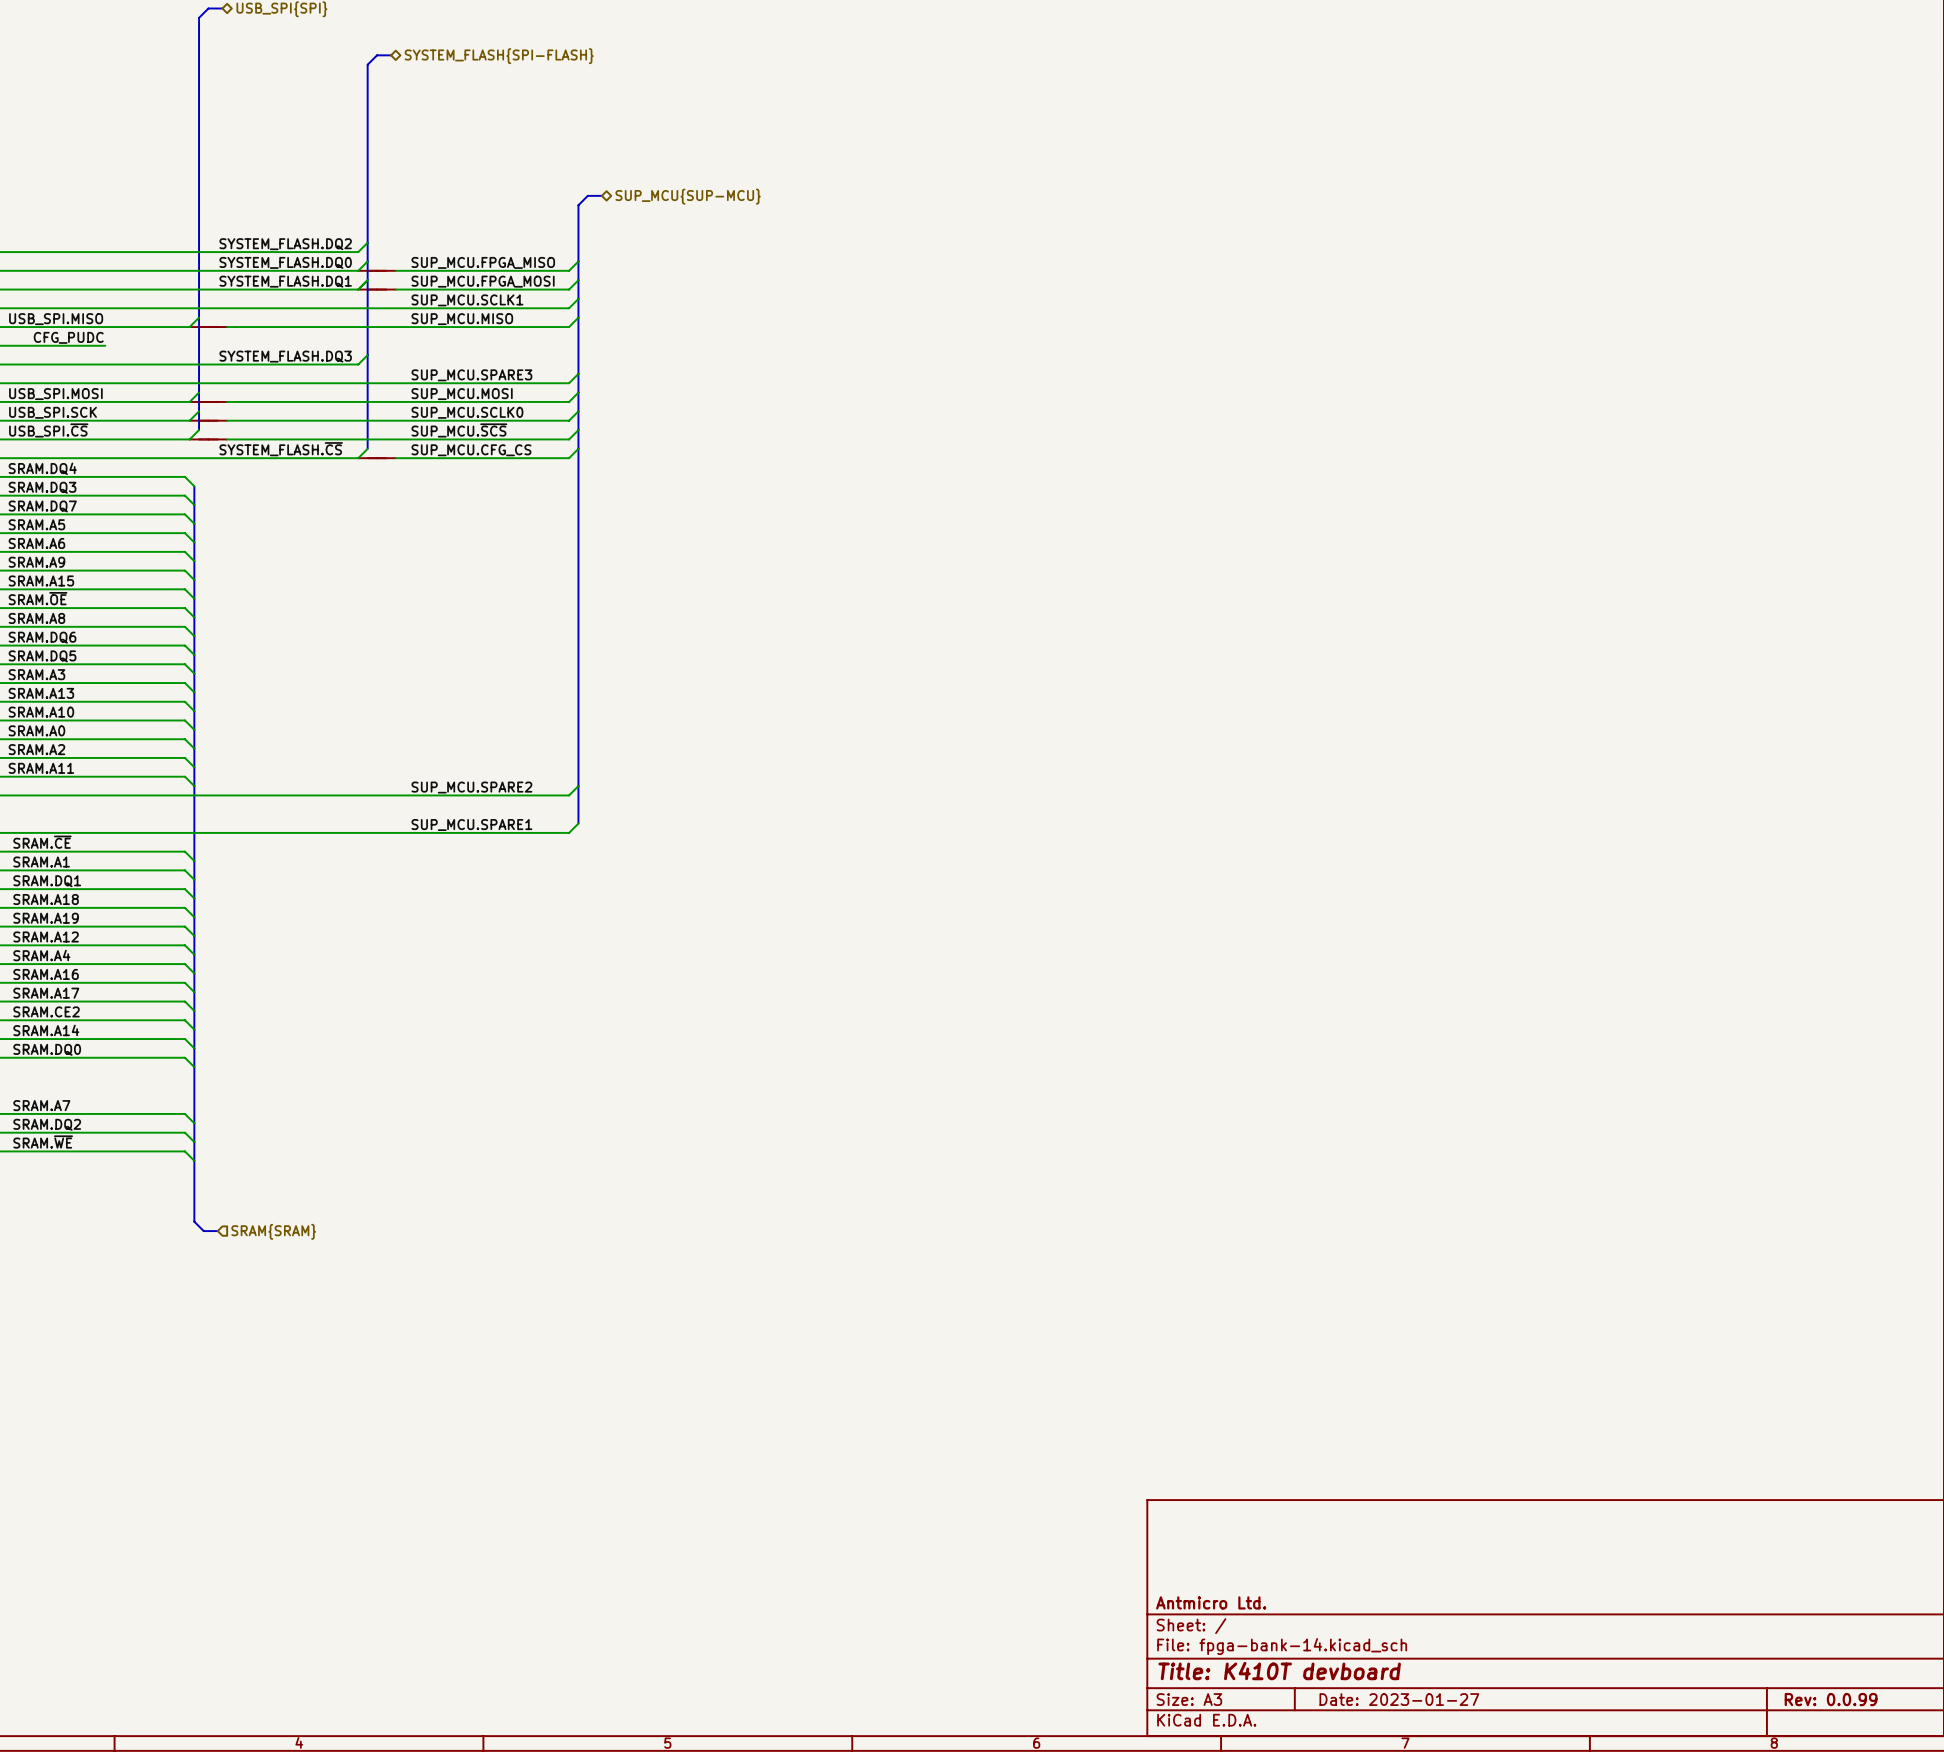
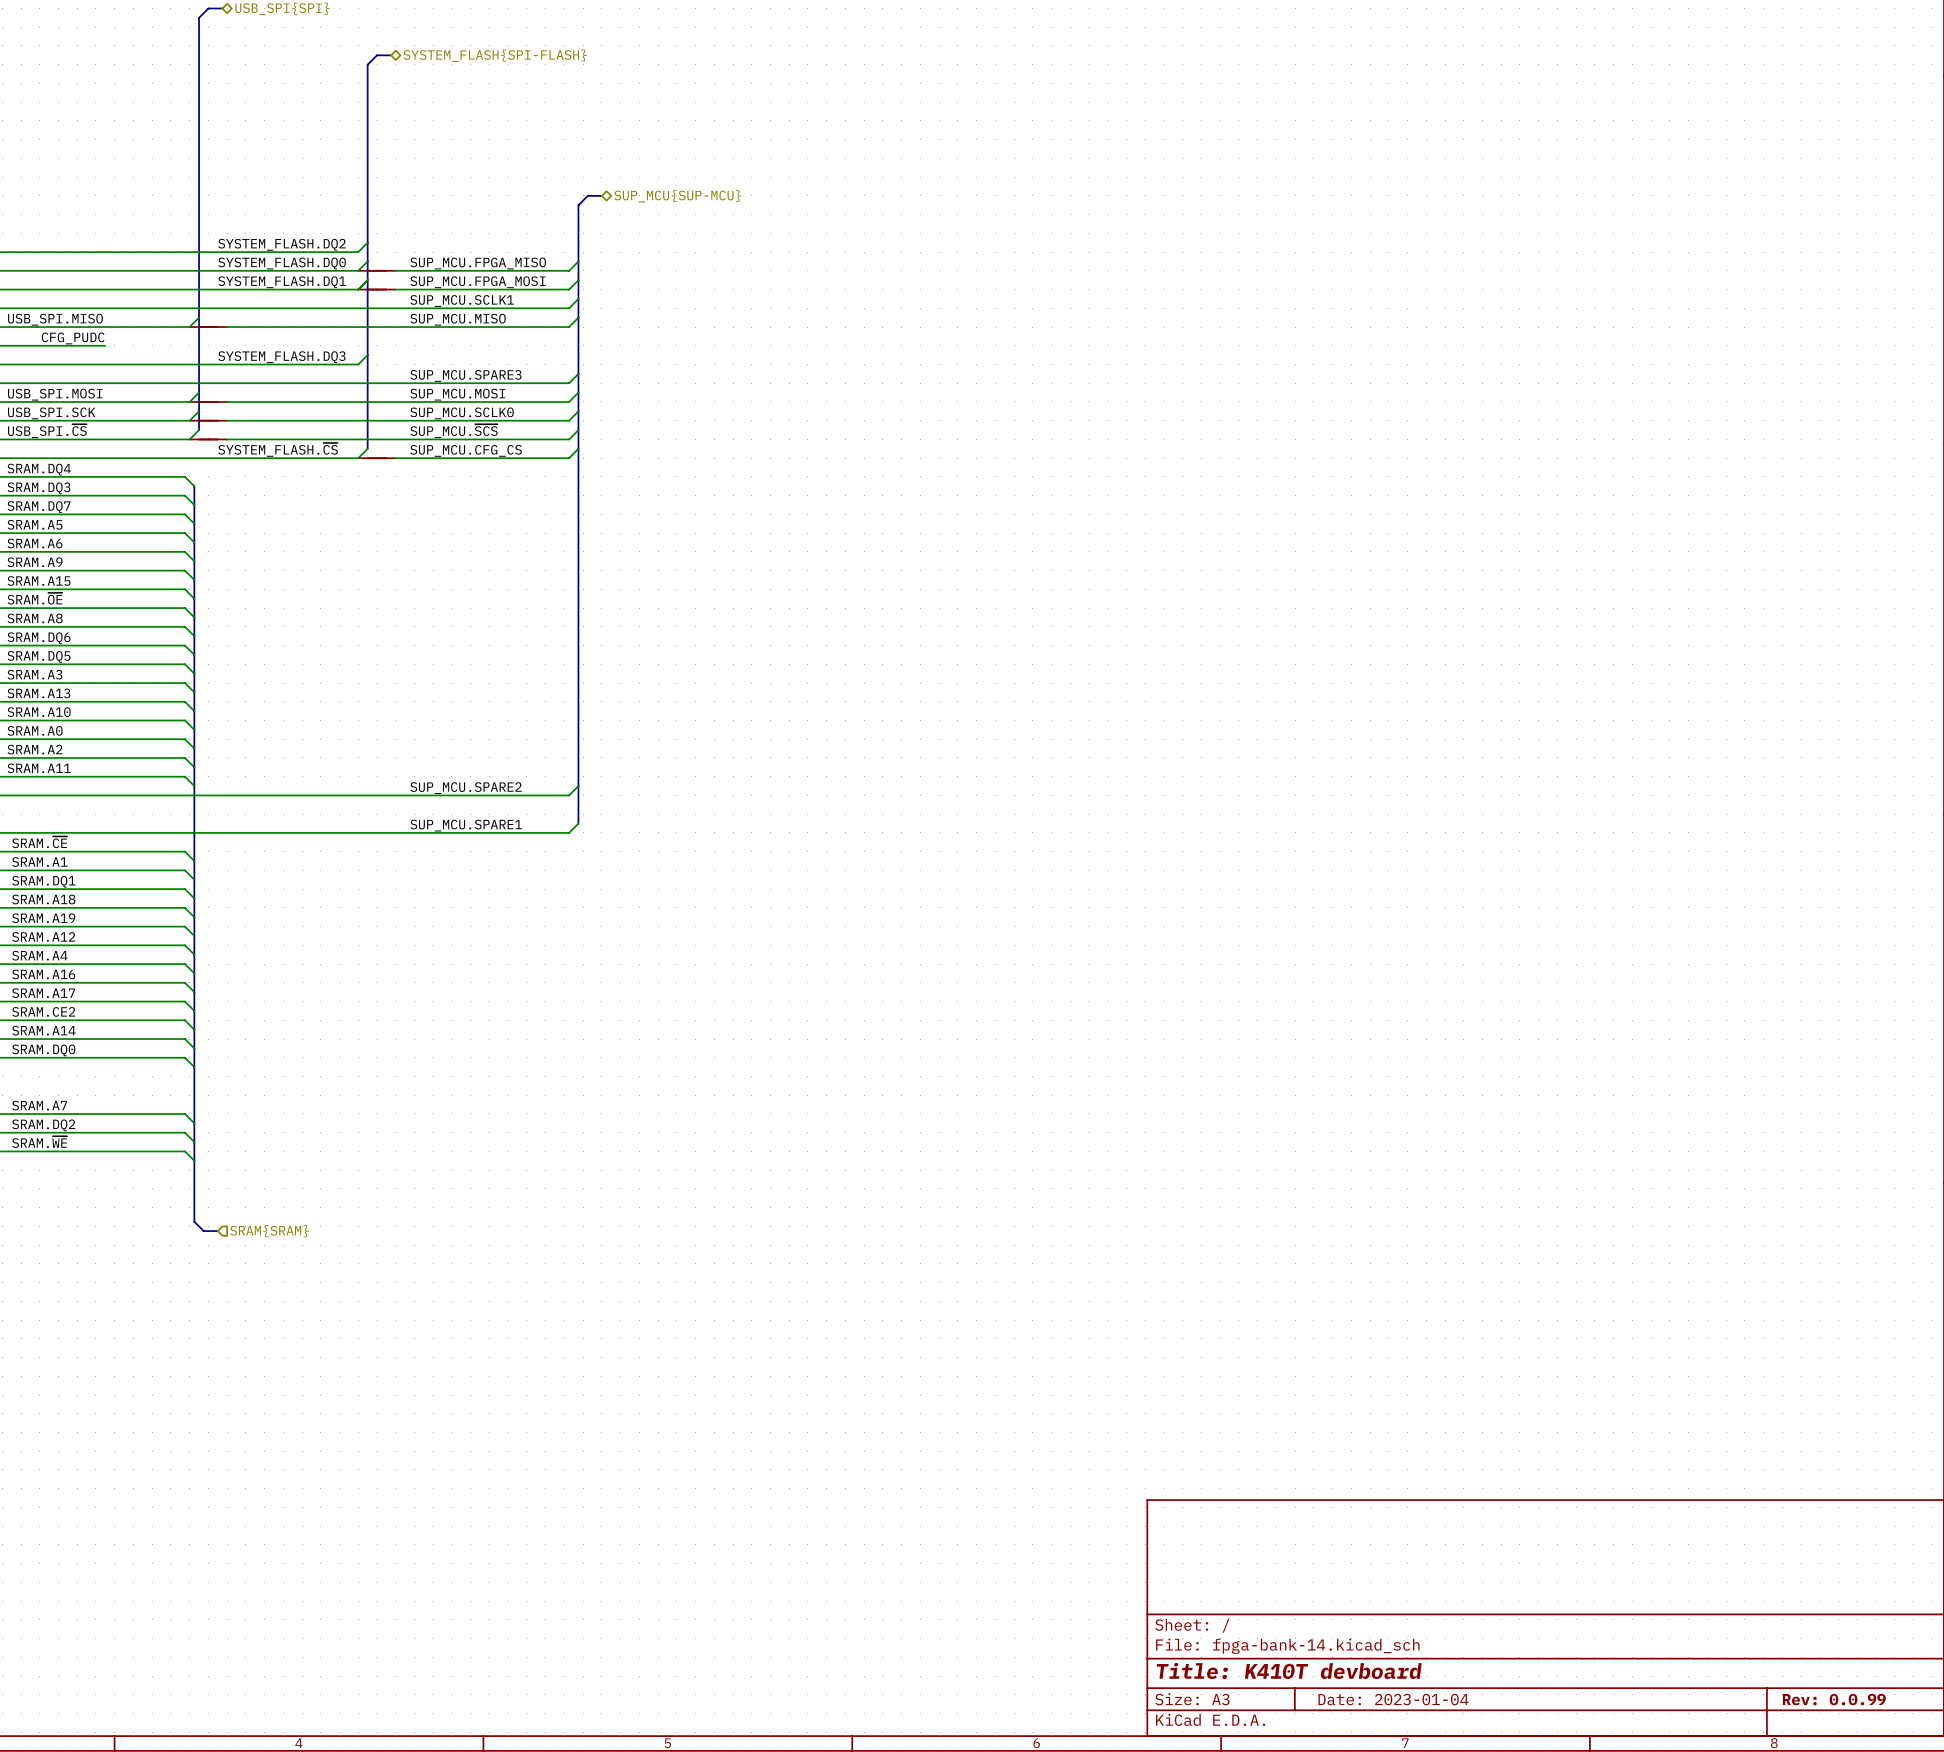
title block: Antmicro Ltd. (1211, 1602) -> none
title block: Date: 2023-01-27 (1399, 1699) -> Date: 2023-01-04 (1393, 1699)

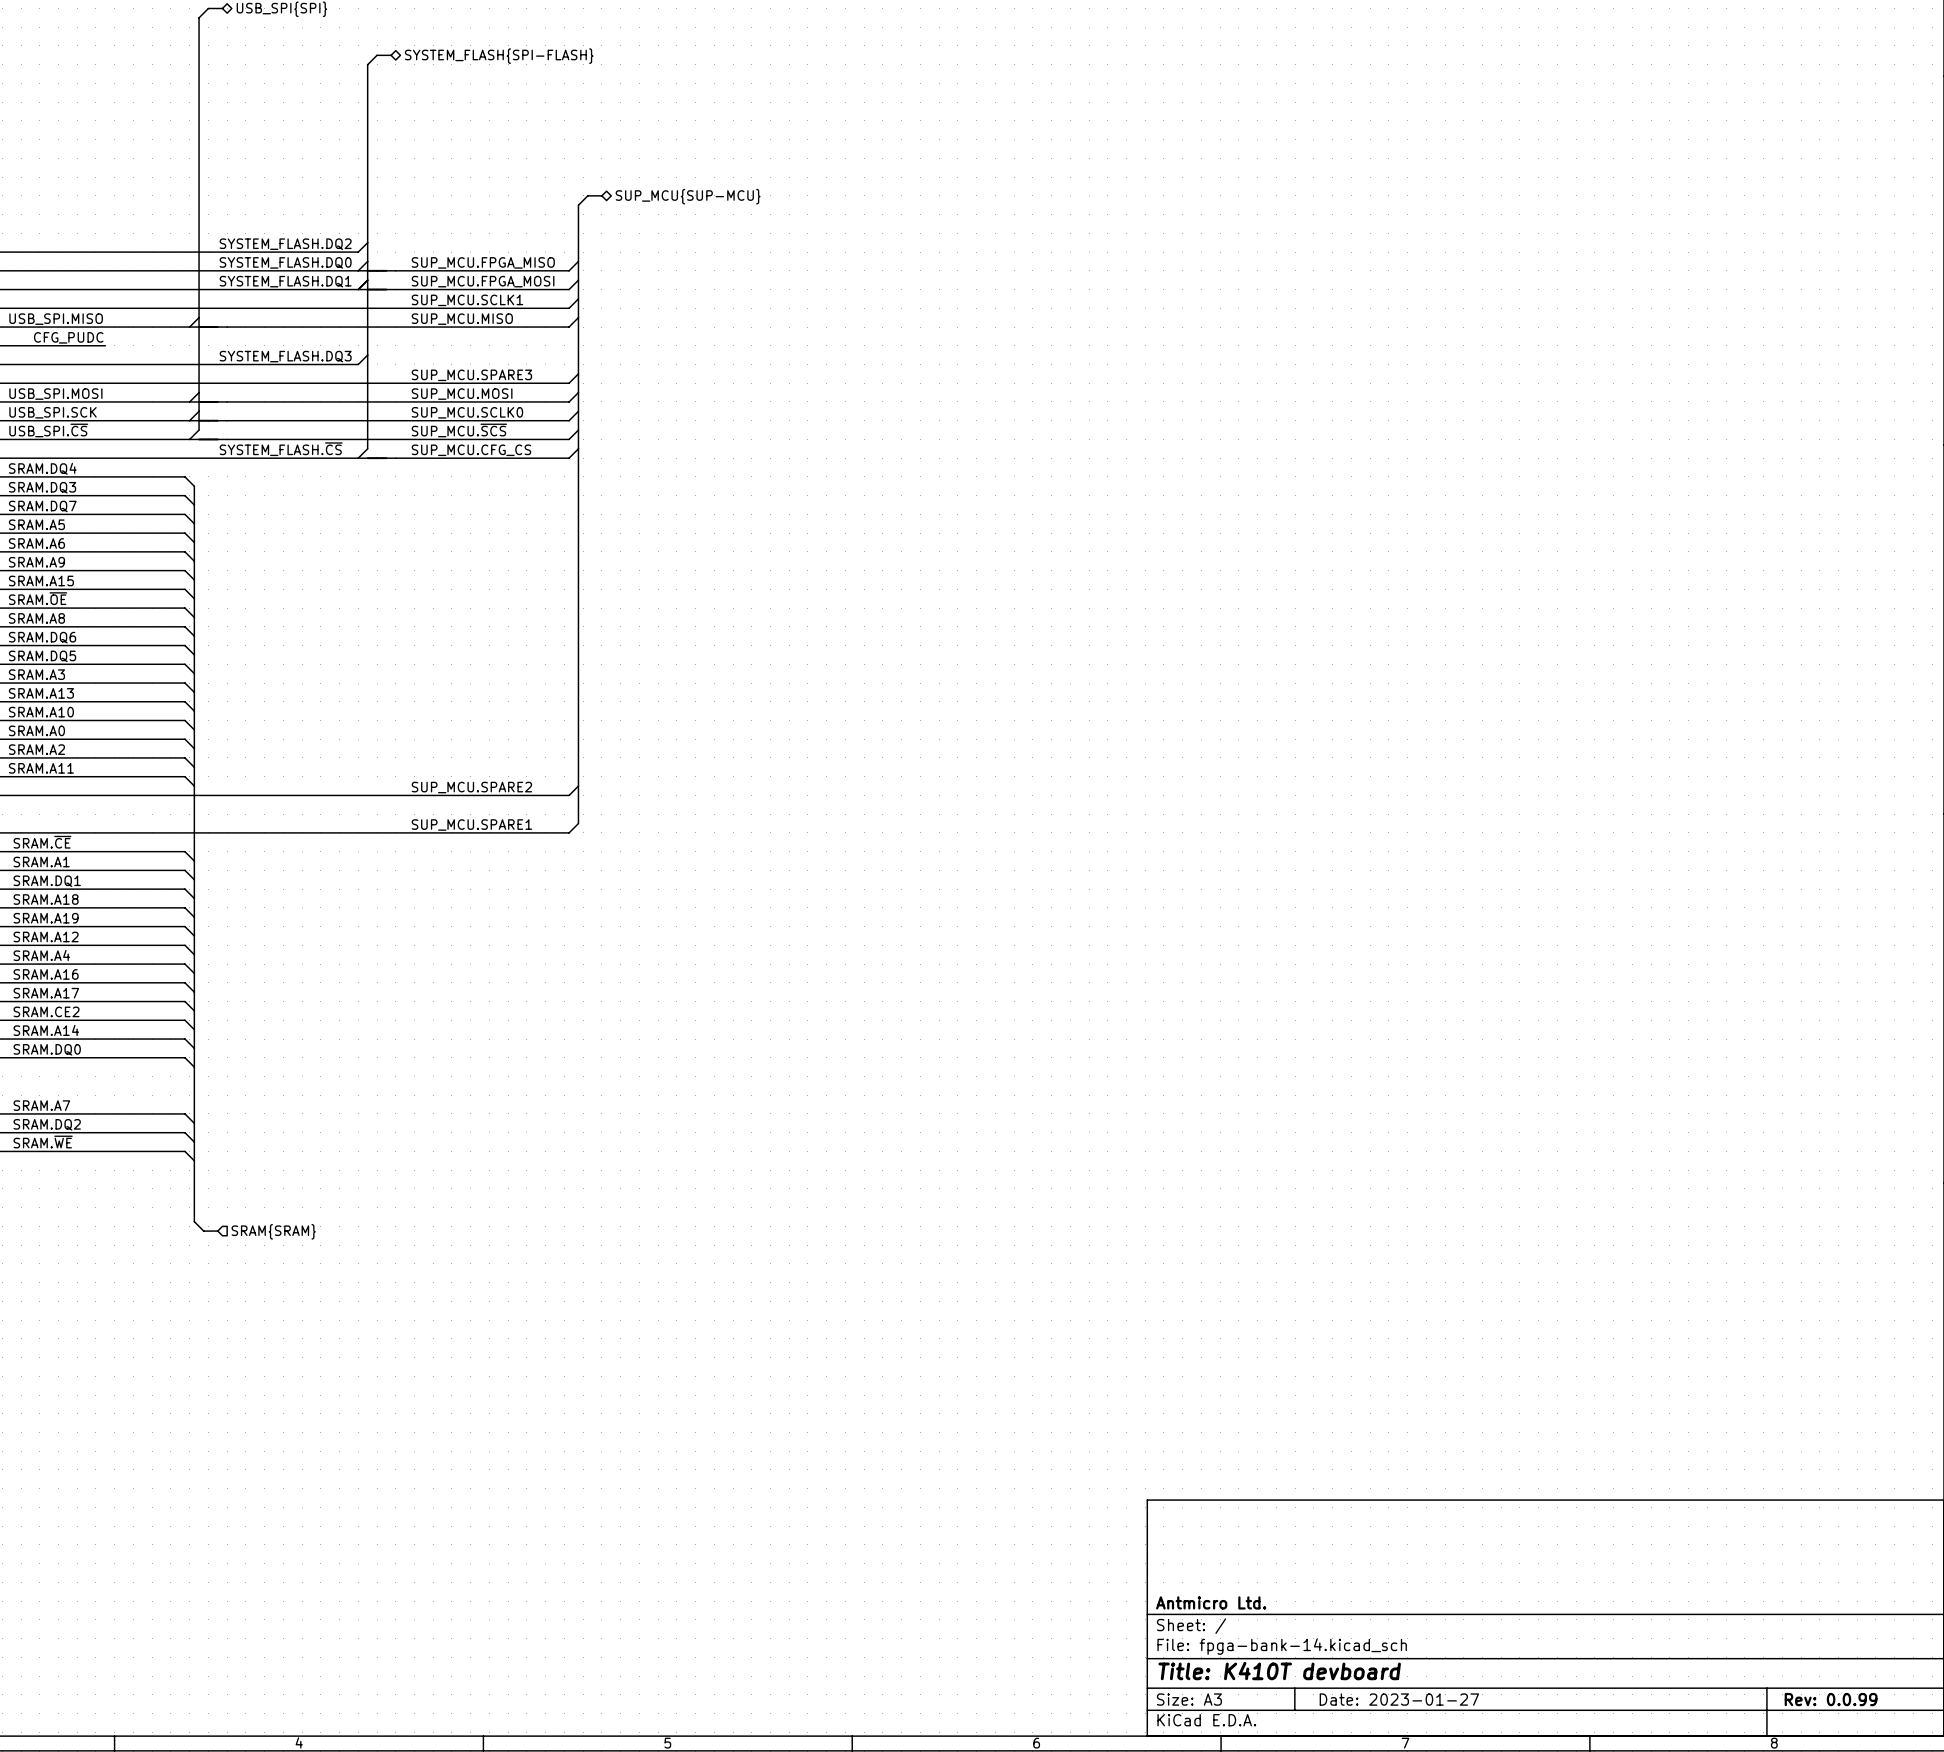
title block: none -> Antmicro Ltd. (1211, 1602)
title block: Date: 2023-01-04 (1393, 1699) -> Date: 2023-01-27 (1399, 1699)

